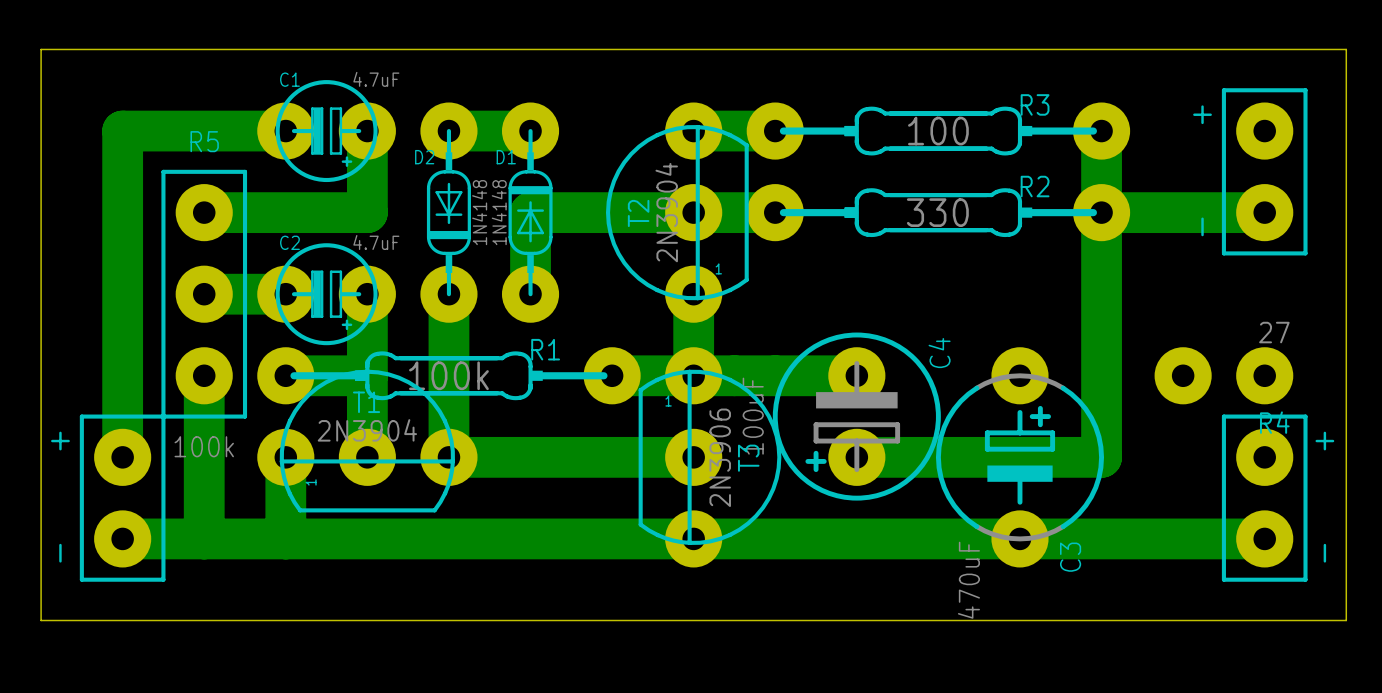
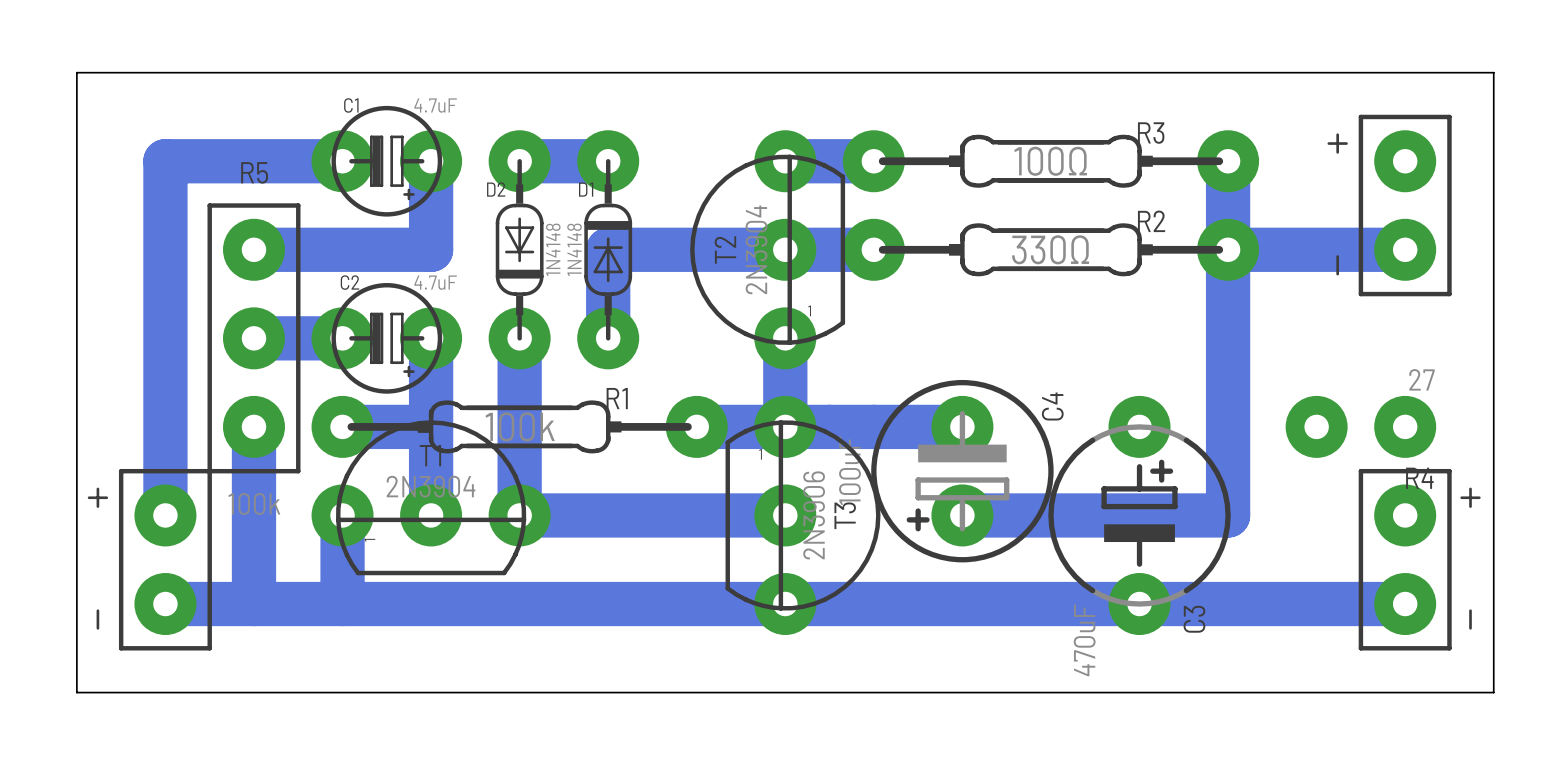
R3 value: 100 (938, 131) -> 100Ω (1050, 161)
R2 value: 330 (937, 212) -> 330Ω (1050, 249)

